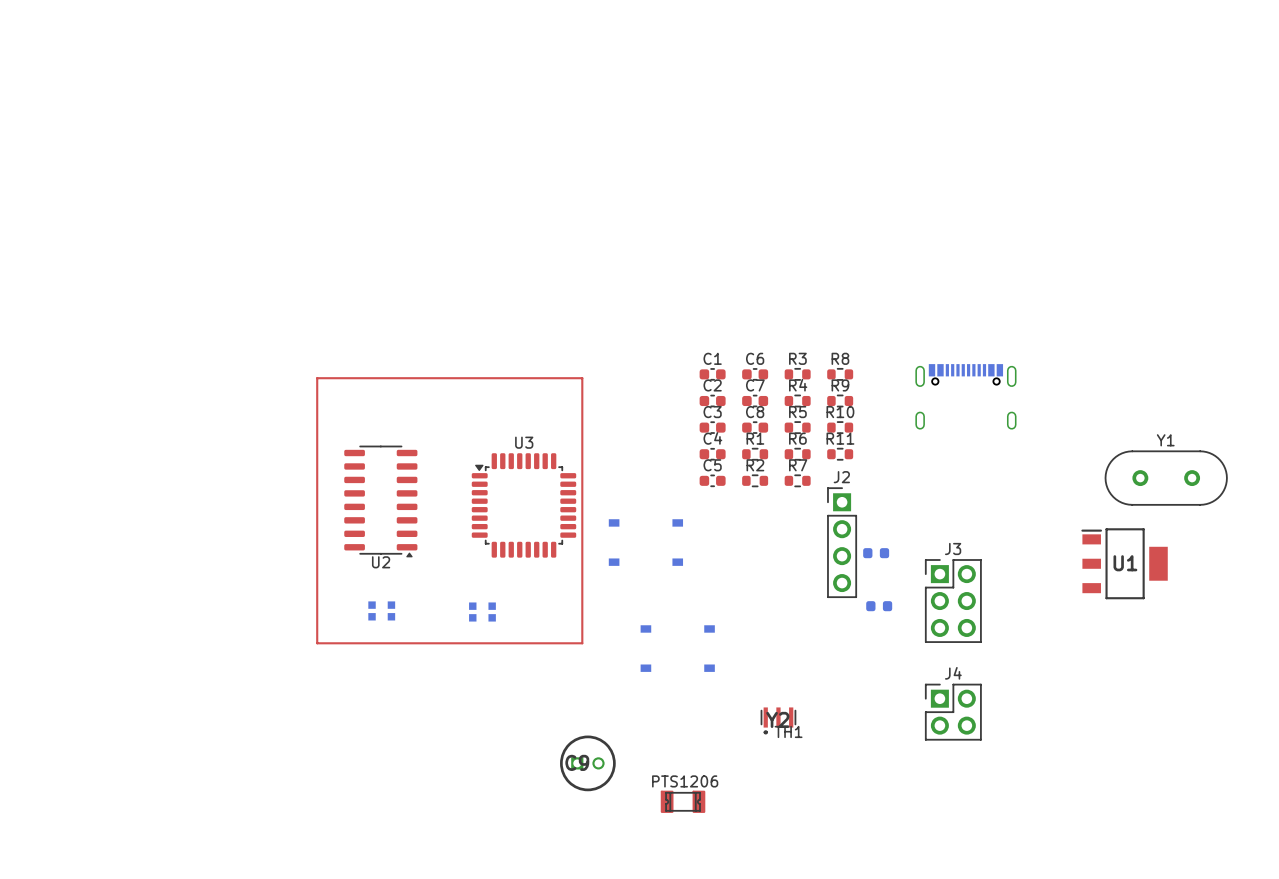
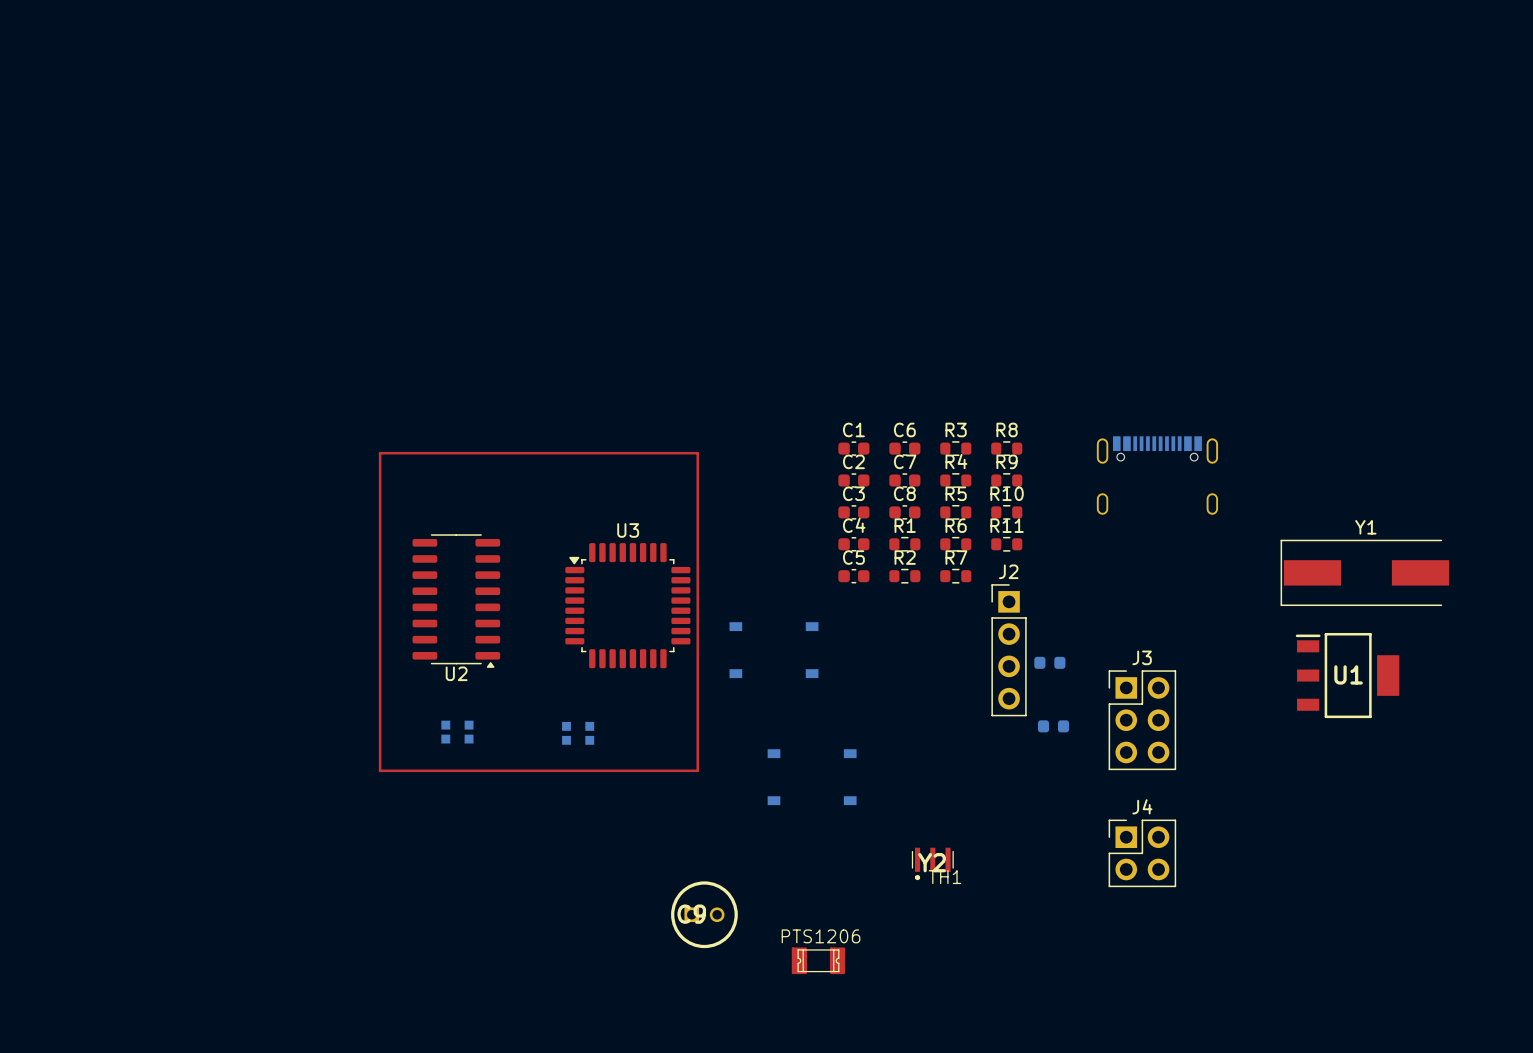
Y1 footprint: [1104, 450, 1228, 506] -> [1280, 539, 1450, 607]

